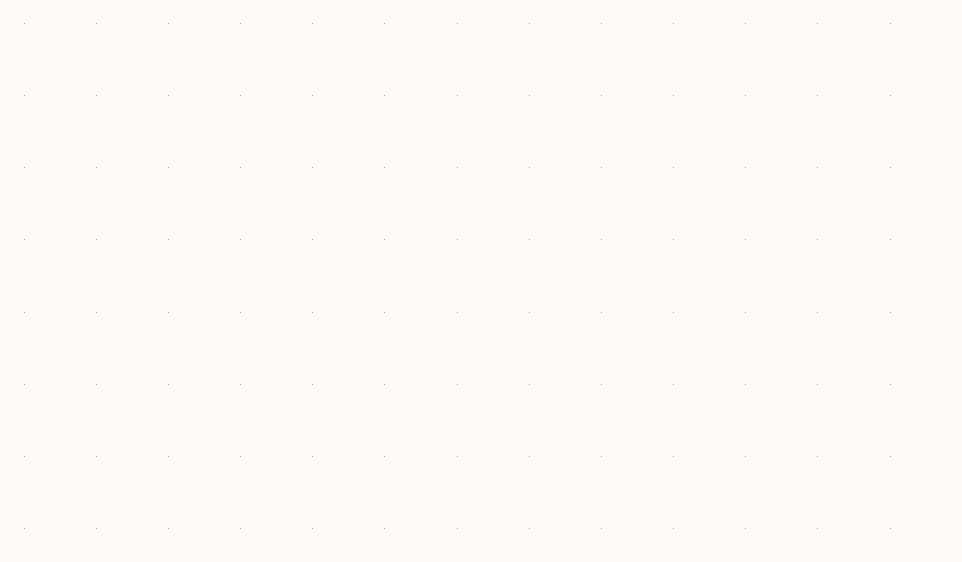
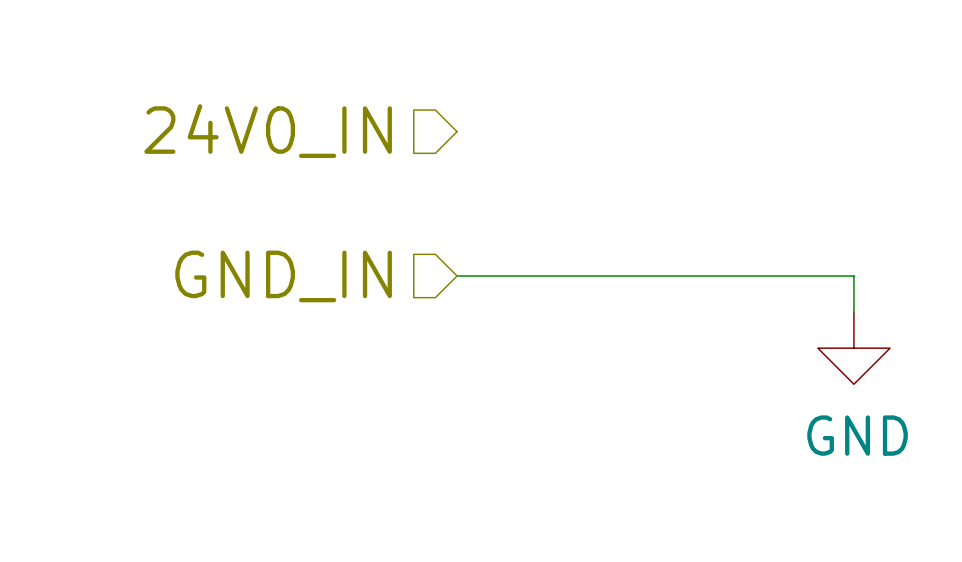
hierarchical label: none -> 24V0_IN (268, 131)
wire: none -> (457, 276) (853, 276) (853, 312)
hierarchical label: none -> GND_IN (283, 276)
power symbol: none -> GND (853, 348)

